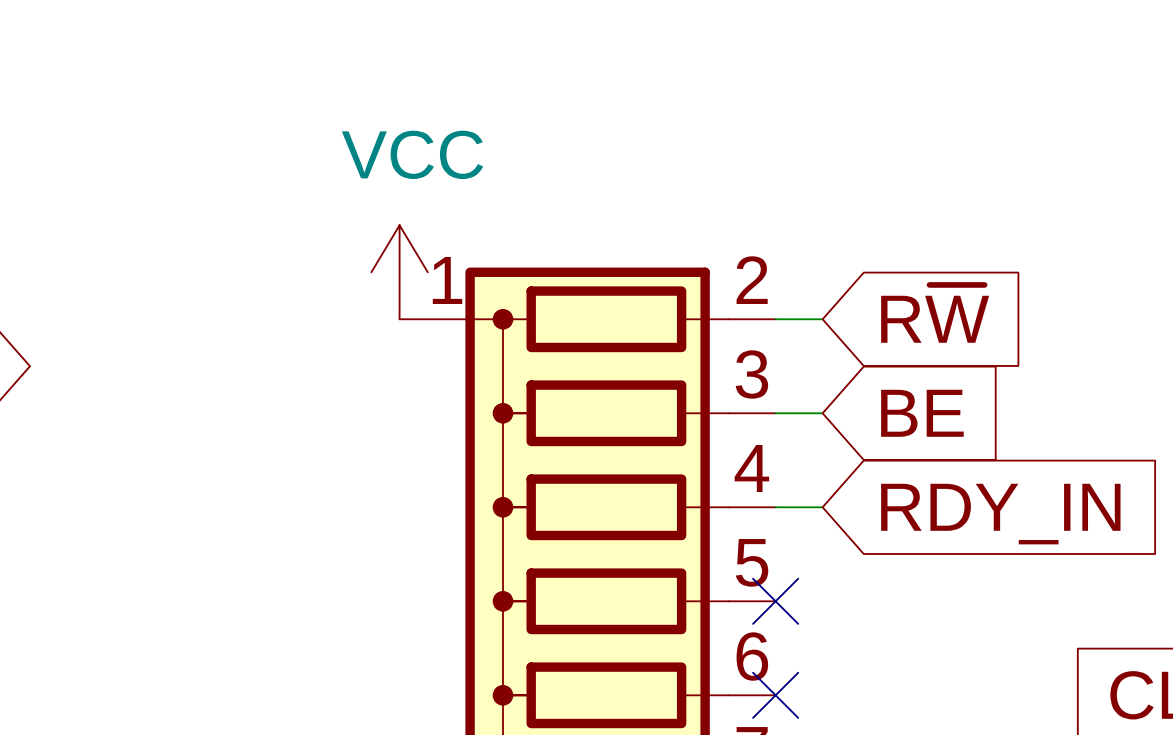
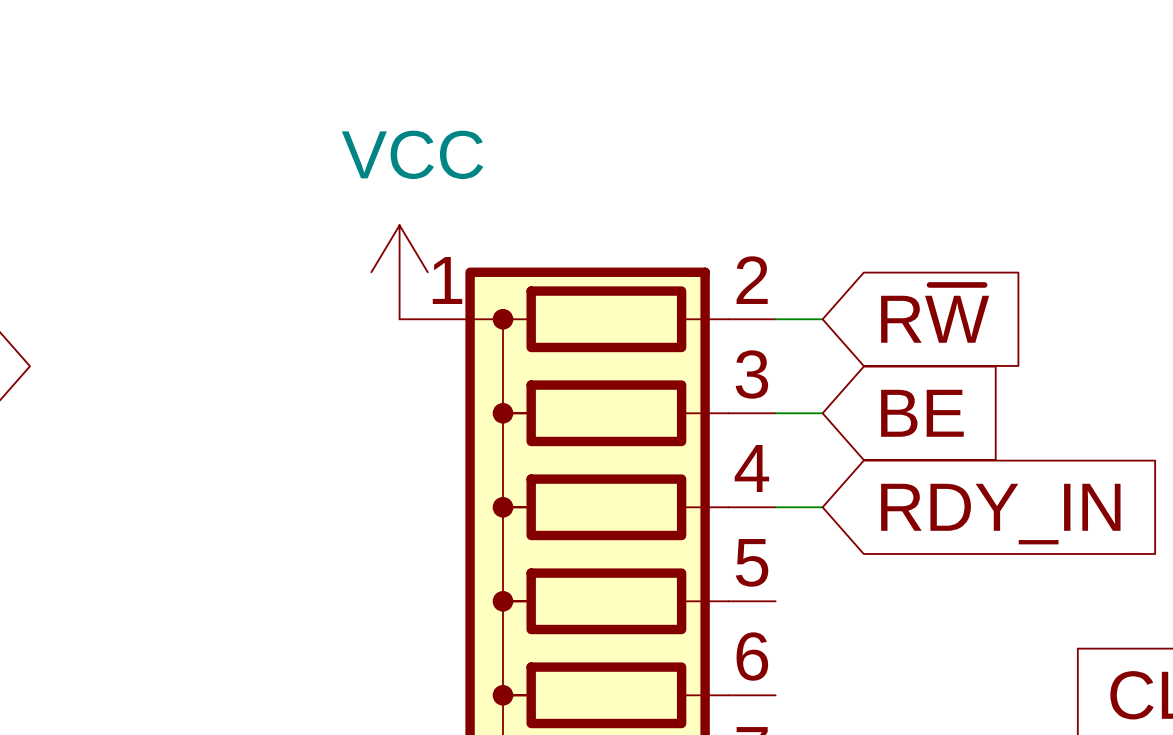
no-connect mark: (775, 601) -> none
no-connect mark: (775, 695) -> none

